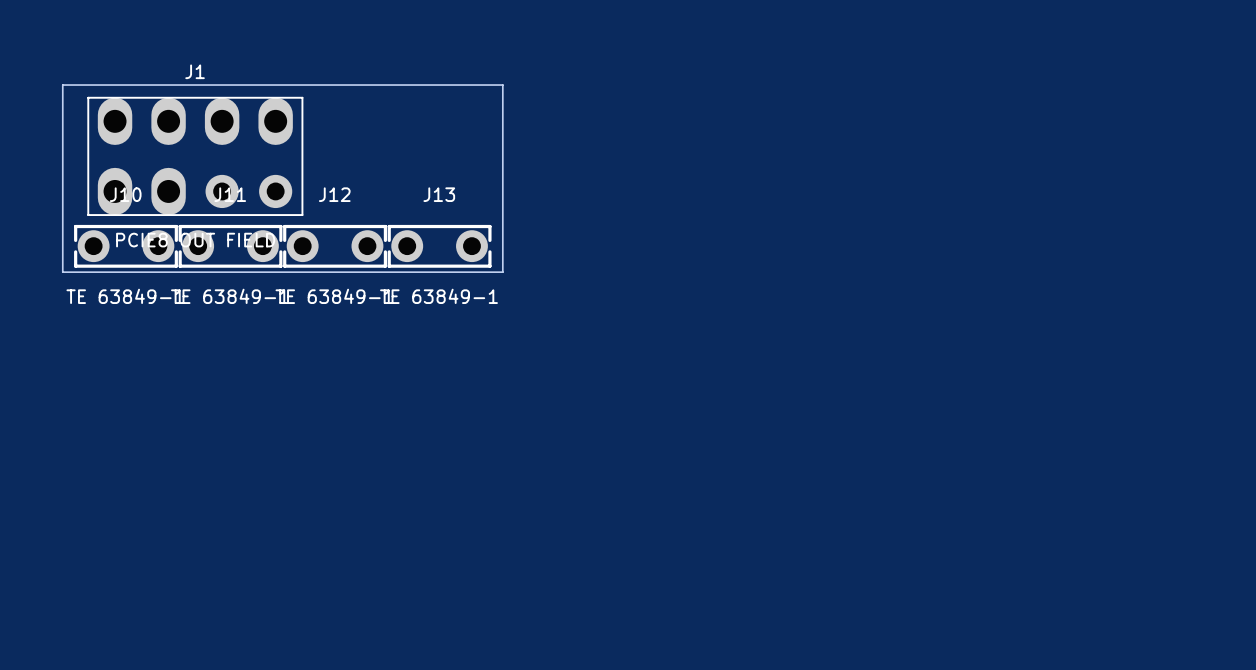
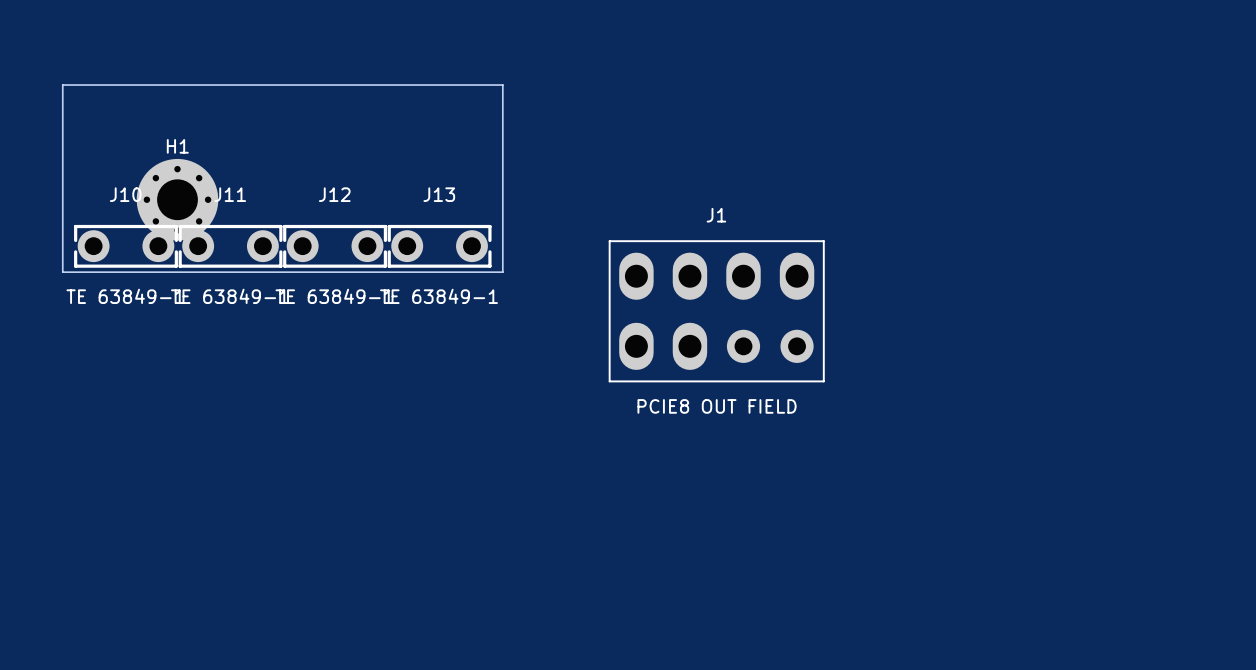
J1 footprint: [87, 96, 304, 217] -> [608, 240, 825, 383]
H1: none -> (177, 199)

